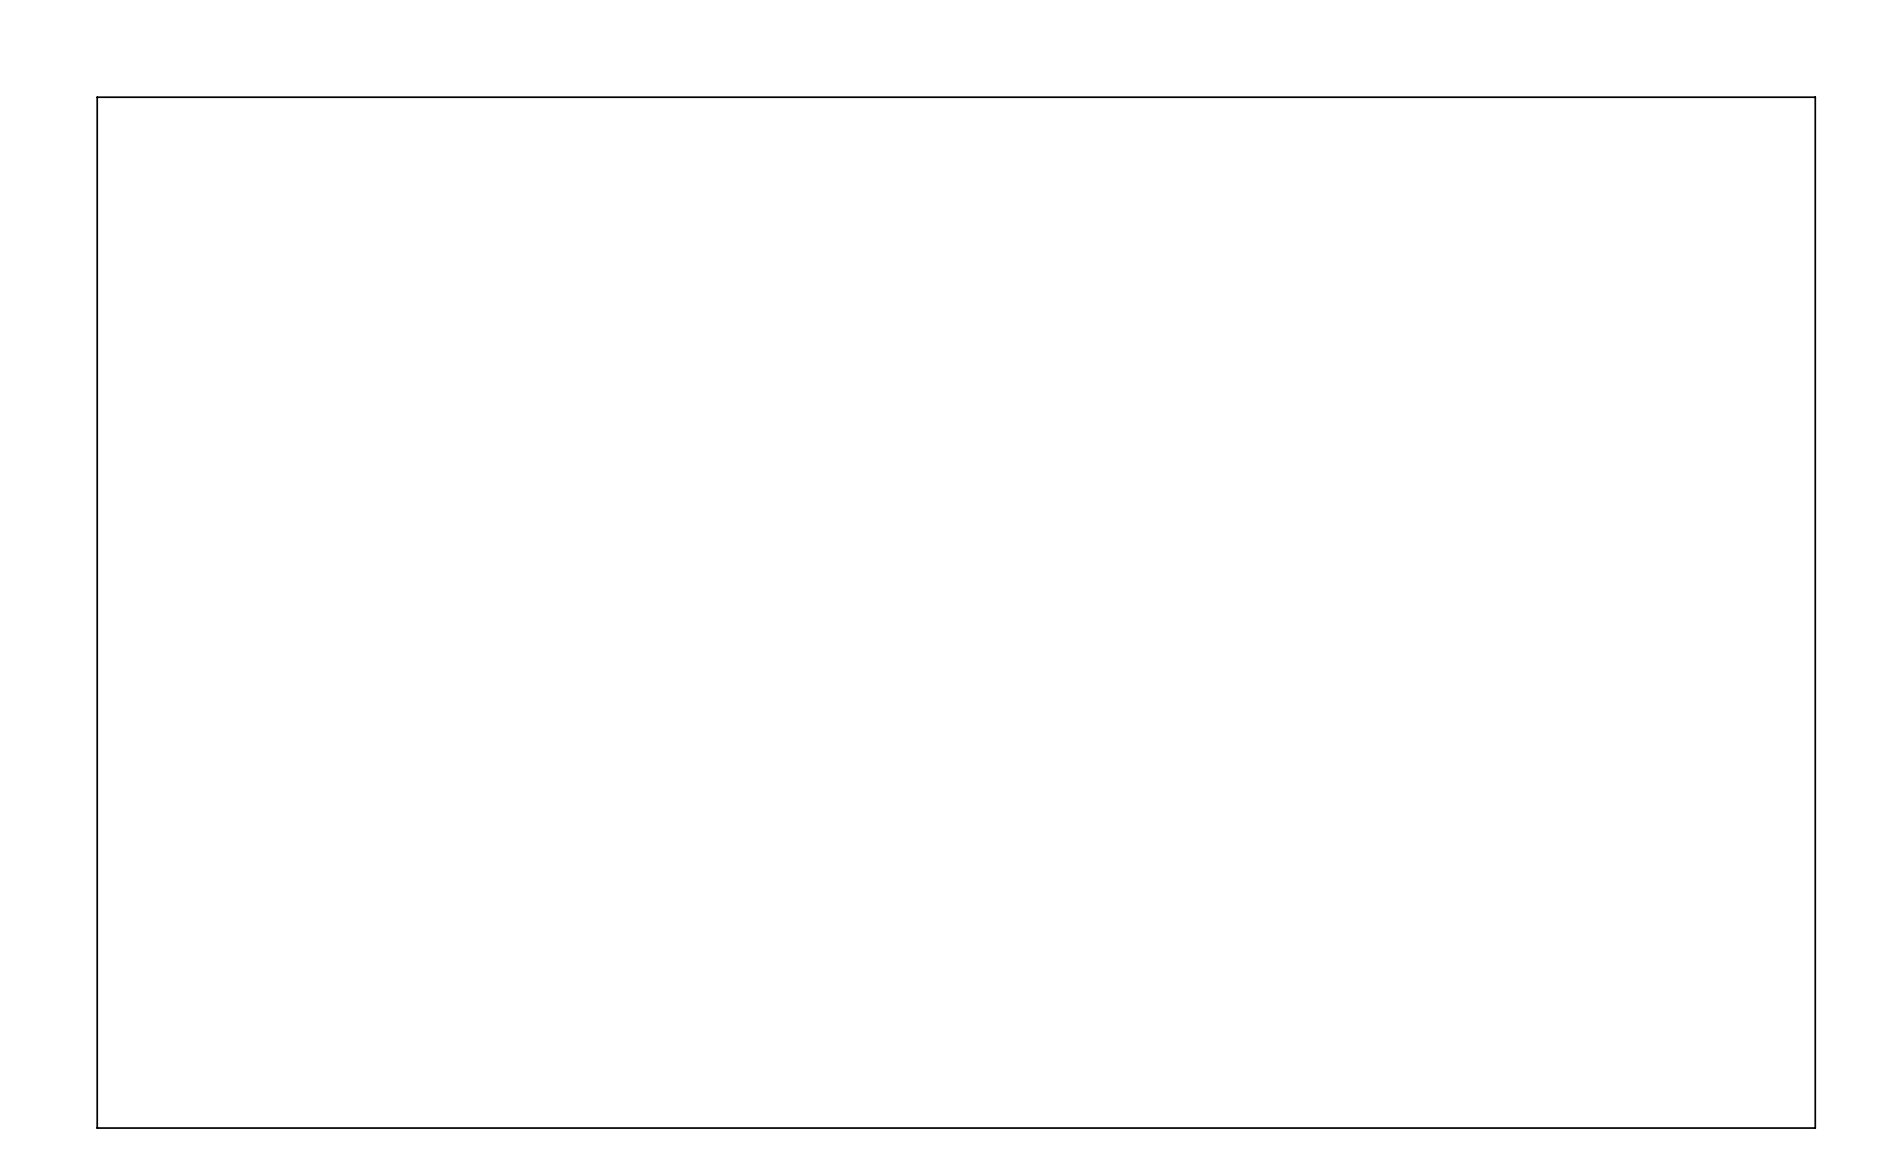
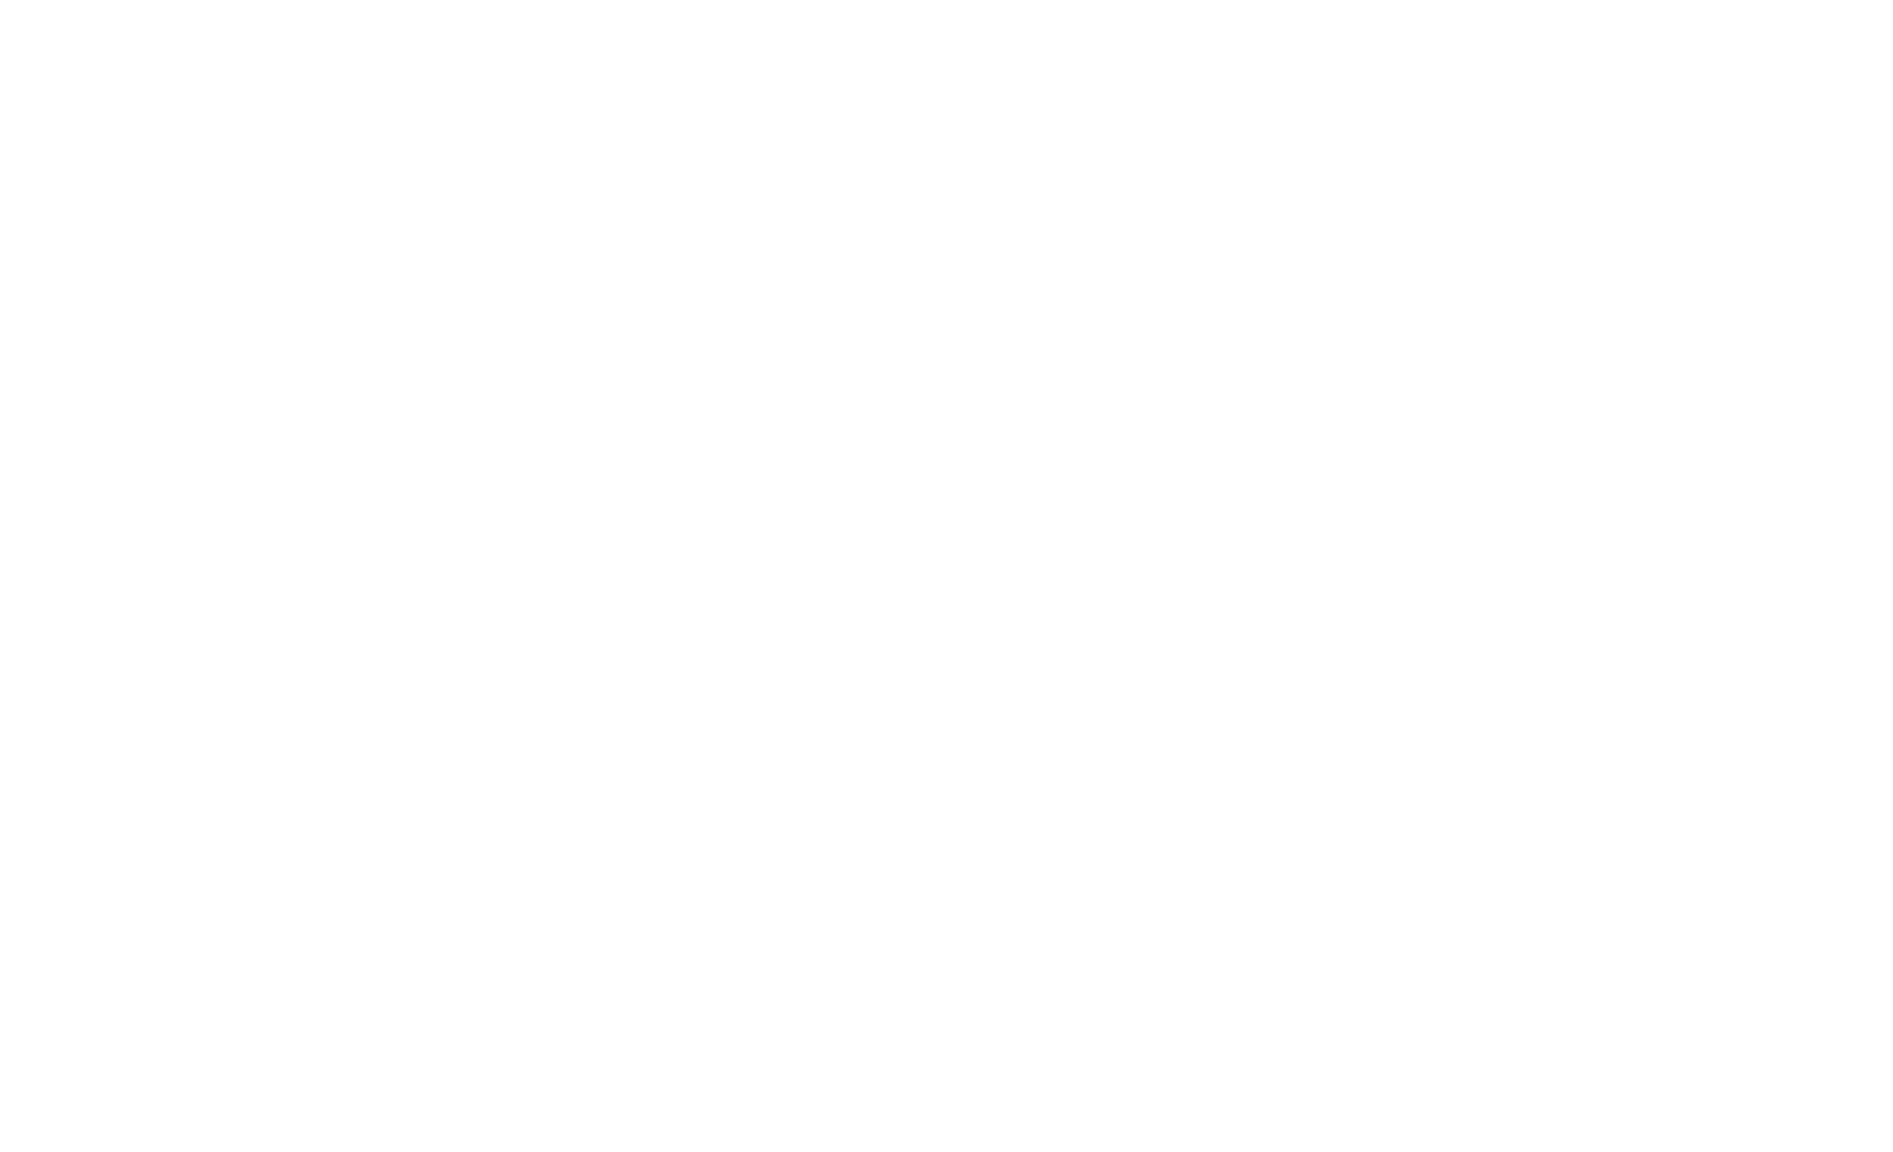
board edge: (97, 97) (1815, 97) (1815, 1128) (97, 1128) (97, 97) -> none

